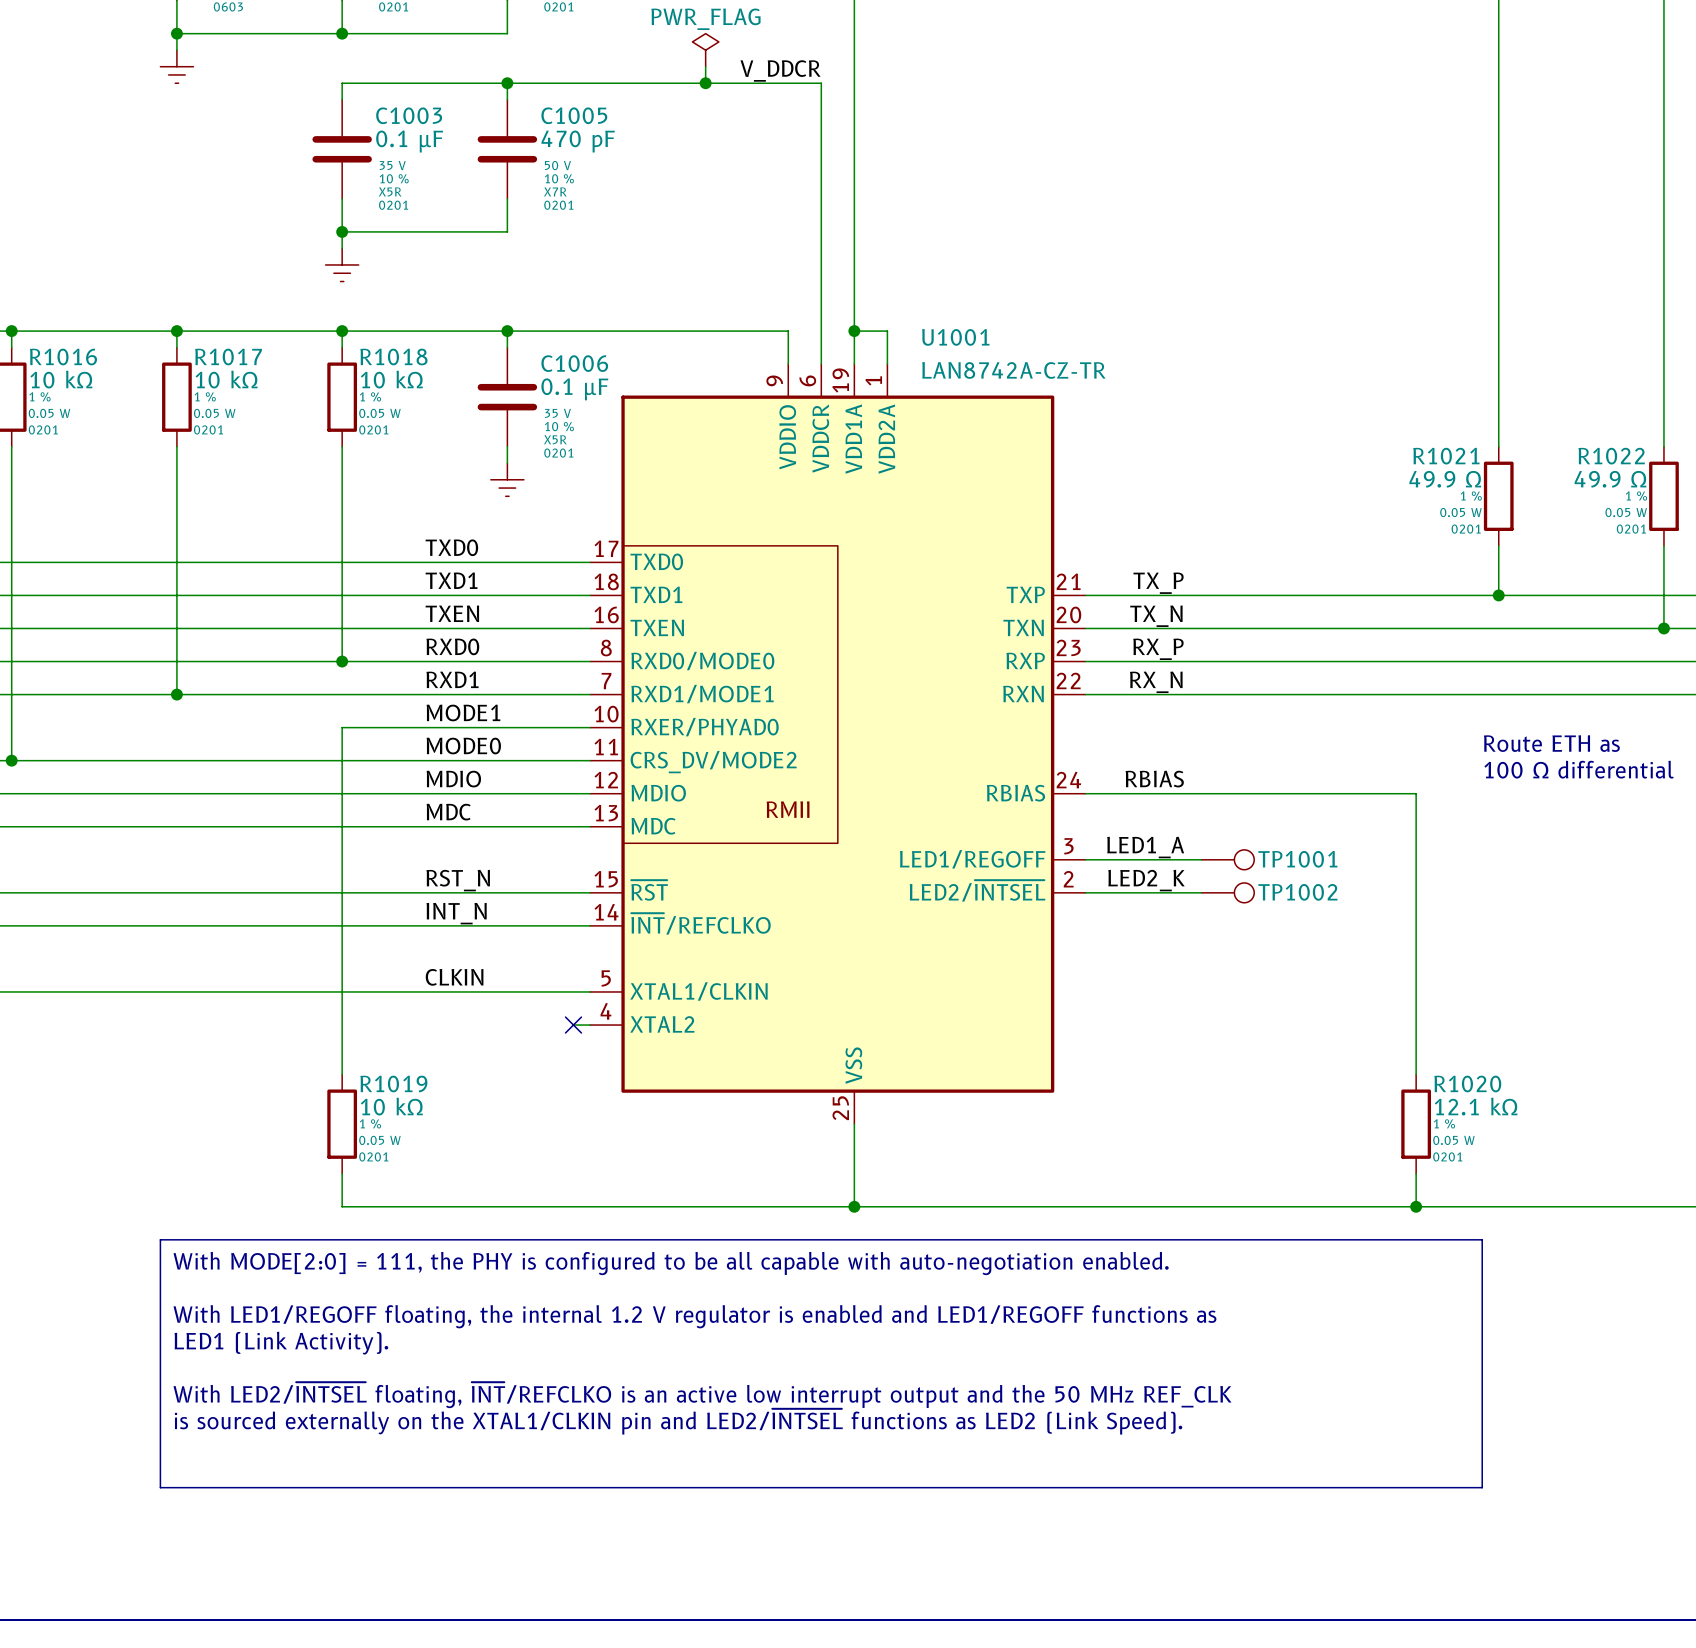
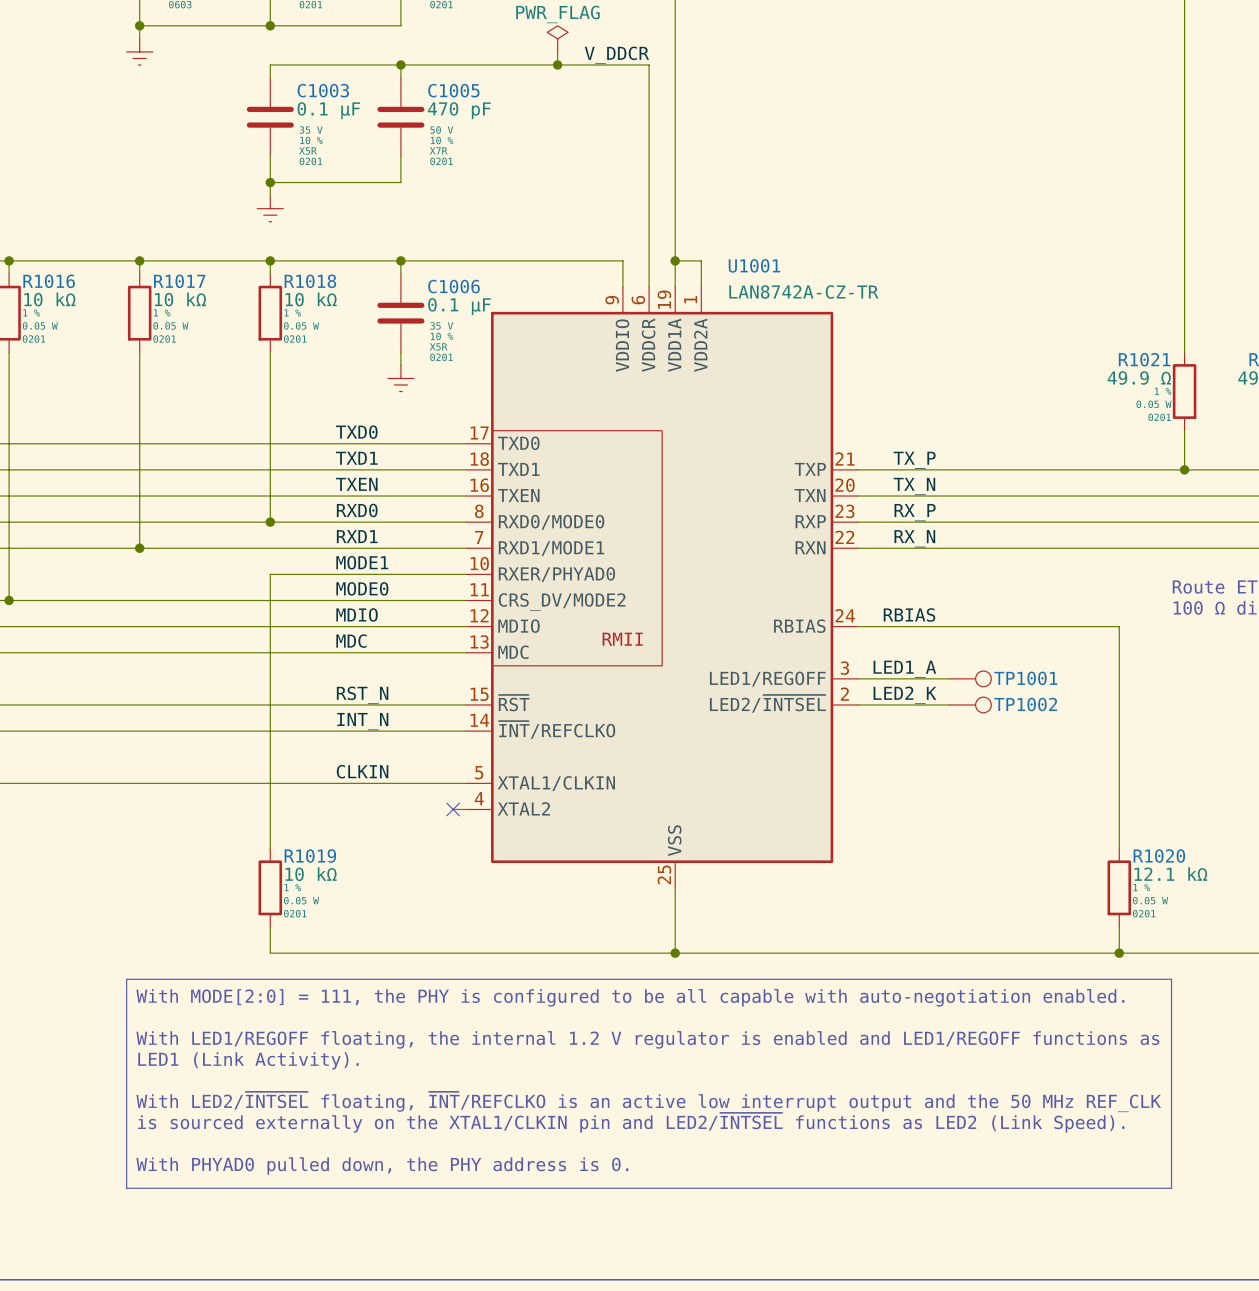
text: none -> With PHYAD0 pulled down, the PHY address is 0. (382, 1165)
line: (160, 1487) (1482, 1487) -> (126, 1175) (126, 1188) (1171, 1188) (1171, 1175)

